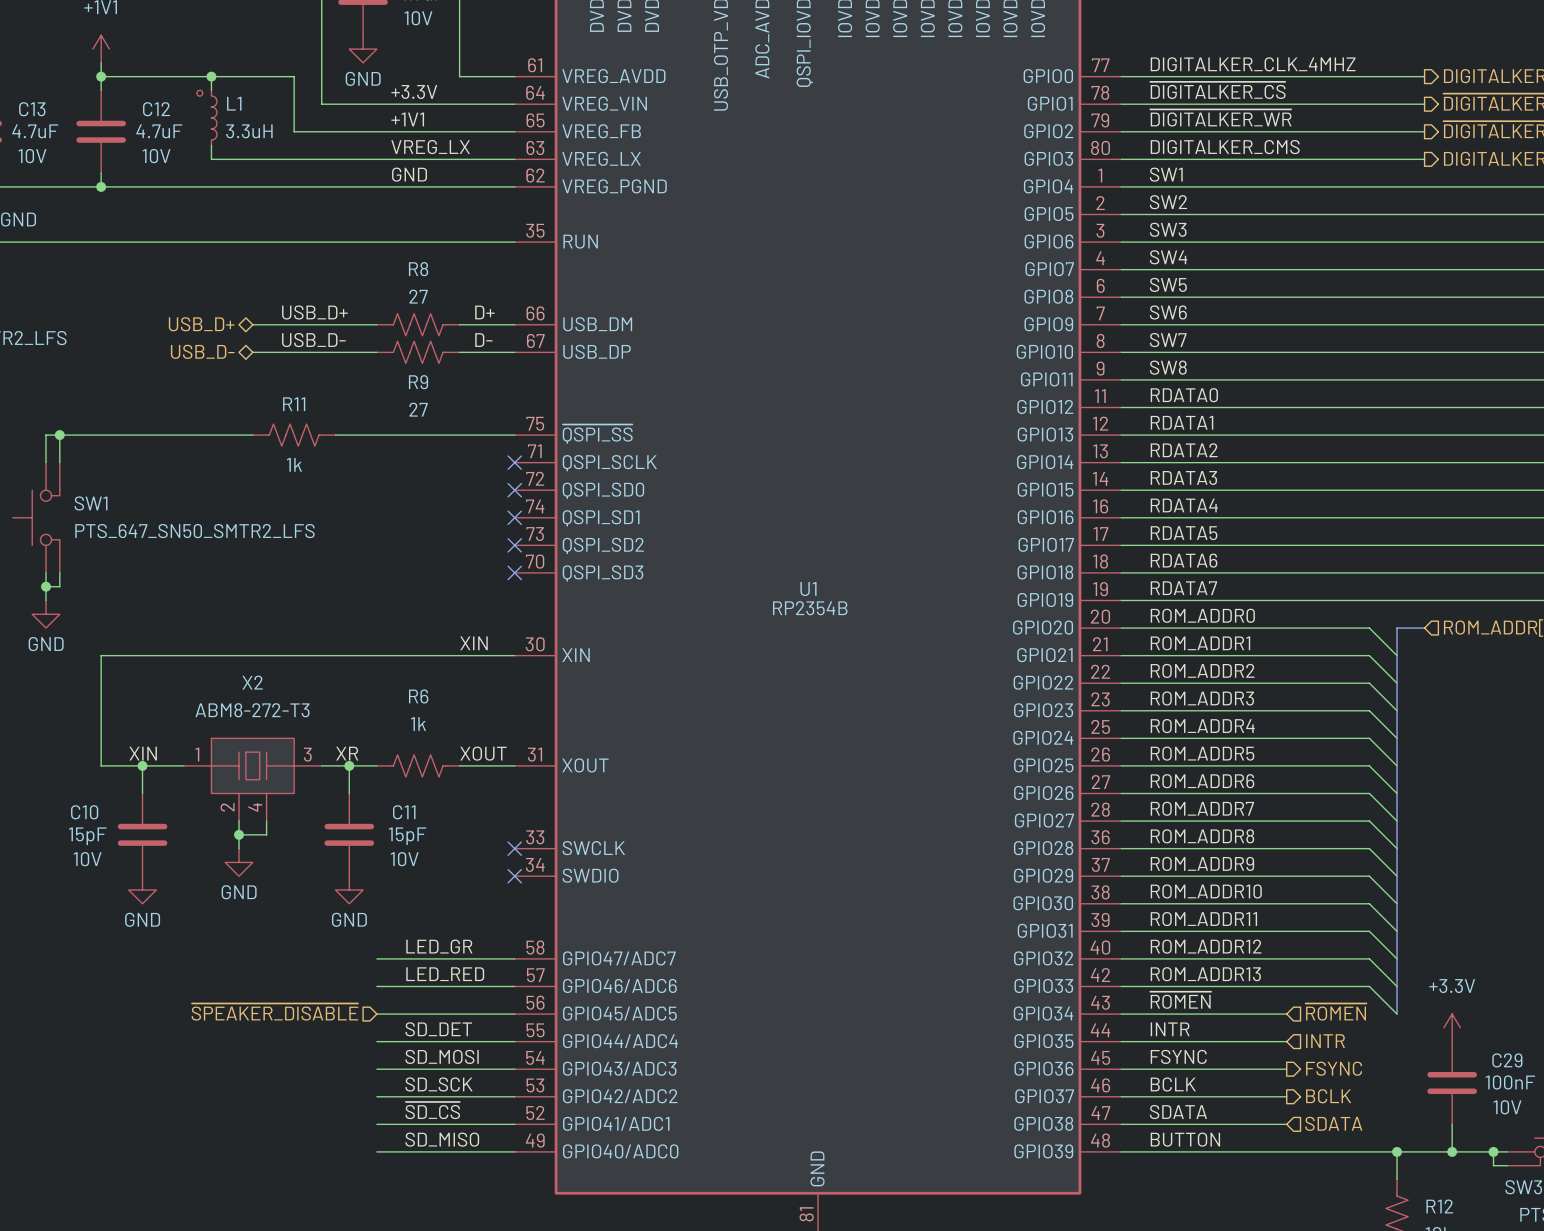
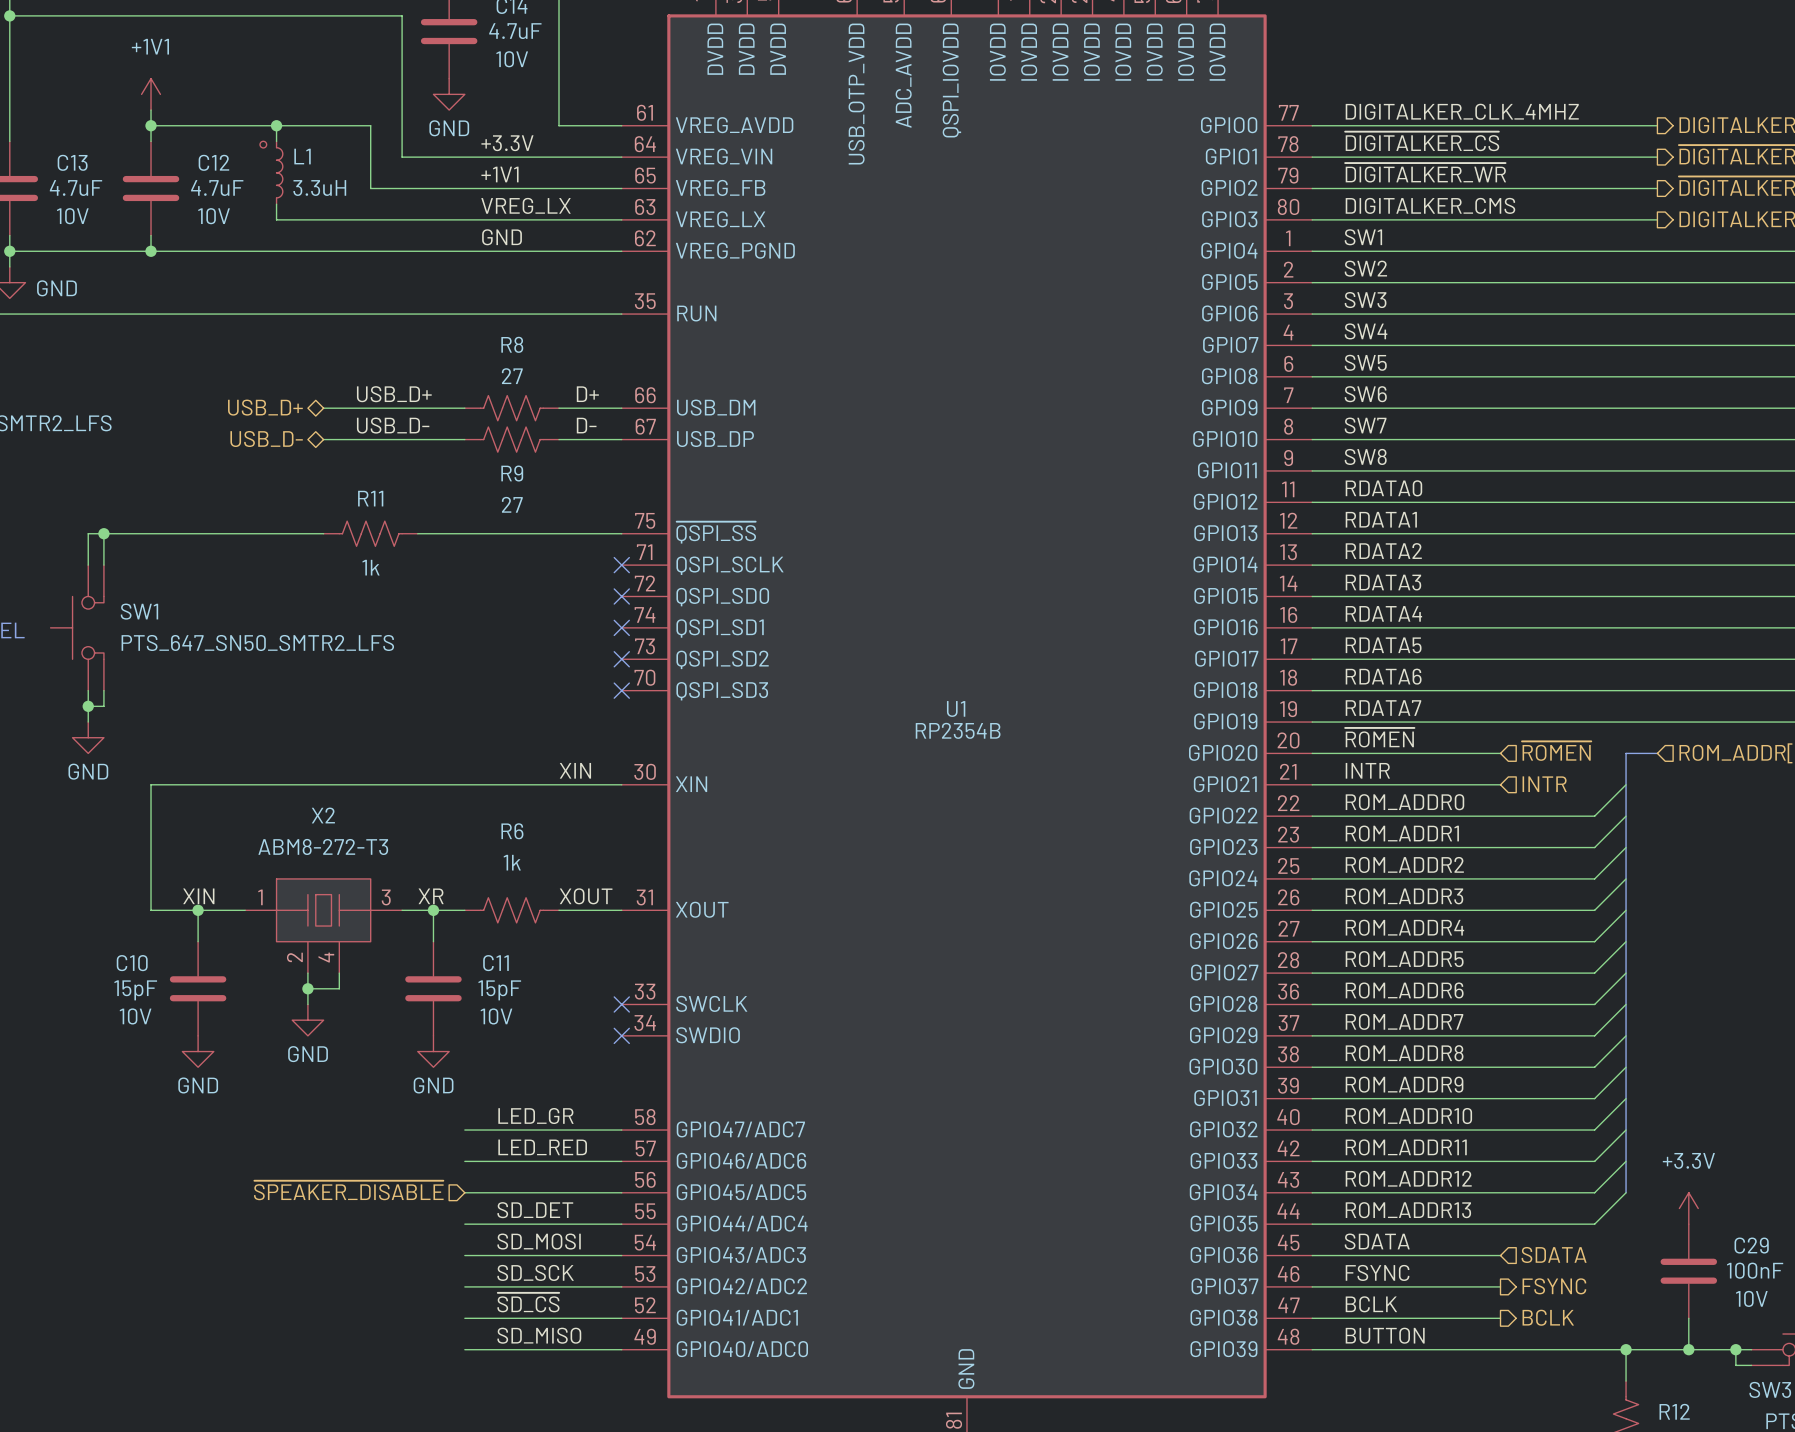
label: ROM_ADDR0 (1202, 615) -> ~{ROMEN} (1379, 737)
hierarchical label: none -> ~{ROMEN} (1556, 751)
wire: (1286, 628) (1369, 628) (1397, 655) -> none
label: ROM_ADDR1 (1200, 643) -> INTR (1367, 770)
wire: (1286, 655) (1369, 655) (1397, 683) -> none
hierarchical label: none -> INTR (1544, 784)
label: ROM_ADDR2 (1202, 670) -> ROM_ADDR0 (1404, 802)
wire: (1369, 683) (1397, 710) -> (1594, 816) (1626, 784)
label: ROM_ADDR3 (1202, 698) -> ROM_ADDR1 (1402, 833)
wire: (1369, 710) (1397, 738) -> (1594, 847) (1626, 816)
label: ROM_ADDR4 (1202, 726) -> ROM_ADDR2 (1404, 864)
wire: (1369, 738) (1397, 765) -> (1594, 878) (1626, 847)
label: ROM_ADDR5 (1202, 753) -> ROM_ADDR3 (1404, 896)
wire: (1369, 765) (1397, 793) -> (1594, 910) (1626, 878)
label: ROM_ADDR6 (1202, 781) -> ROM_ADDR4 (1404, 927)
wire: (1369, 793) (1397, 821) -> (1594, 941) (1626, 910)
label: ROM_ADDR7 (1202, 808) -> ROM_ADDR5 (1404, 959)
wire: (1369, 821) (1397, 848) -> (1594, 973) (1626, 941)
label: ROM_ADDR8 (1202, 836) -> ROM_ADDR6 (1404, 990)
wire: (1369, 848) (1397, 876) -> (1594, 1004) (1626, 973)
label: ROM_ADDR9 (1202, 863) -> ROM_ADDR7 (1404, 1021)
wire: (1369, 876) (1397, 903) -> (1594, 1035) (1626, 1004)
label: ROM_ADDR10 (1206, 891) -> ROM_ADDR8 (1404, 1053)
wire: (1369, 903) (1397, 931) -> (1594, 1067) (1626, 1035)
label: ROM_ADDR11 (1203, 919) -> ROM_ADDR9 (1404, 1084)
wire: (1369, 931) (1397, 958) -> (1594, 1098) (1626, 1067)
label: ROM_ADDR12 (1206, 946) -> ROM_ADDR10 (1408, 1116)
wire: (1369, 958) (1397, 986) -> (1594, 1130) (1626, 1098)
label: ROM_ADDR13 (1205, 974) -> ROM_ADDR11 (1406, 1147)
wire: (1369, 986) (1397, 1014) -> (1594, 1161) (1626, 1130)
wire: none -> (1626, 1161) (1594, 1192) (1500, 1192)
label: ~{ROMEN} (1180, 1000) -> ROM_ADDR12 (1408, 1178)
hierarchical label: ~{ROMEN} (1336, 1012) -> none
wire: none -> (1626, 1192) (1594, 1224) (1500, 1224)
label: INTR (1170, 1029) -> ROM_ADDR13 (1408, 1210)
hierarchical label: INTR (1325, 1041) -> none
label: FSYNC (1178, 1056) -> SDATA (1377, 1241)
hierarchical label shape: output (1334, 1068) -> input (1554, 1254)
hierarchical label: FSYNC (1334, 1068) -> SDATA (1554, 1254)
label: BCLK (1173, 1084) -> FSYNC (1377, 1272)
hierarchical label: BCLK (1328, 1096) -> FSYNC (1554, 1286)
label: SDATA (1178, 1112) -> BCLK (1371, 1304)
hierarchical label shape: input (1333, 1123) -> output (1548, 1317)
hierarchical label: SDATA (1333, 1123) -> BCLK (1548, 1317)

